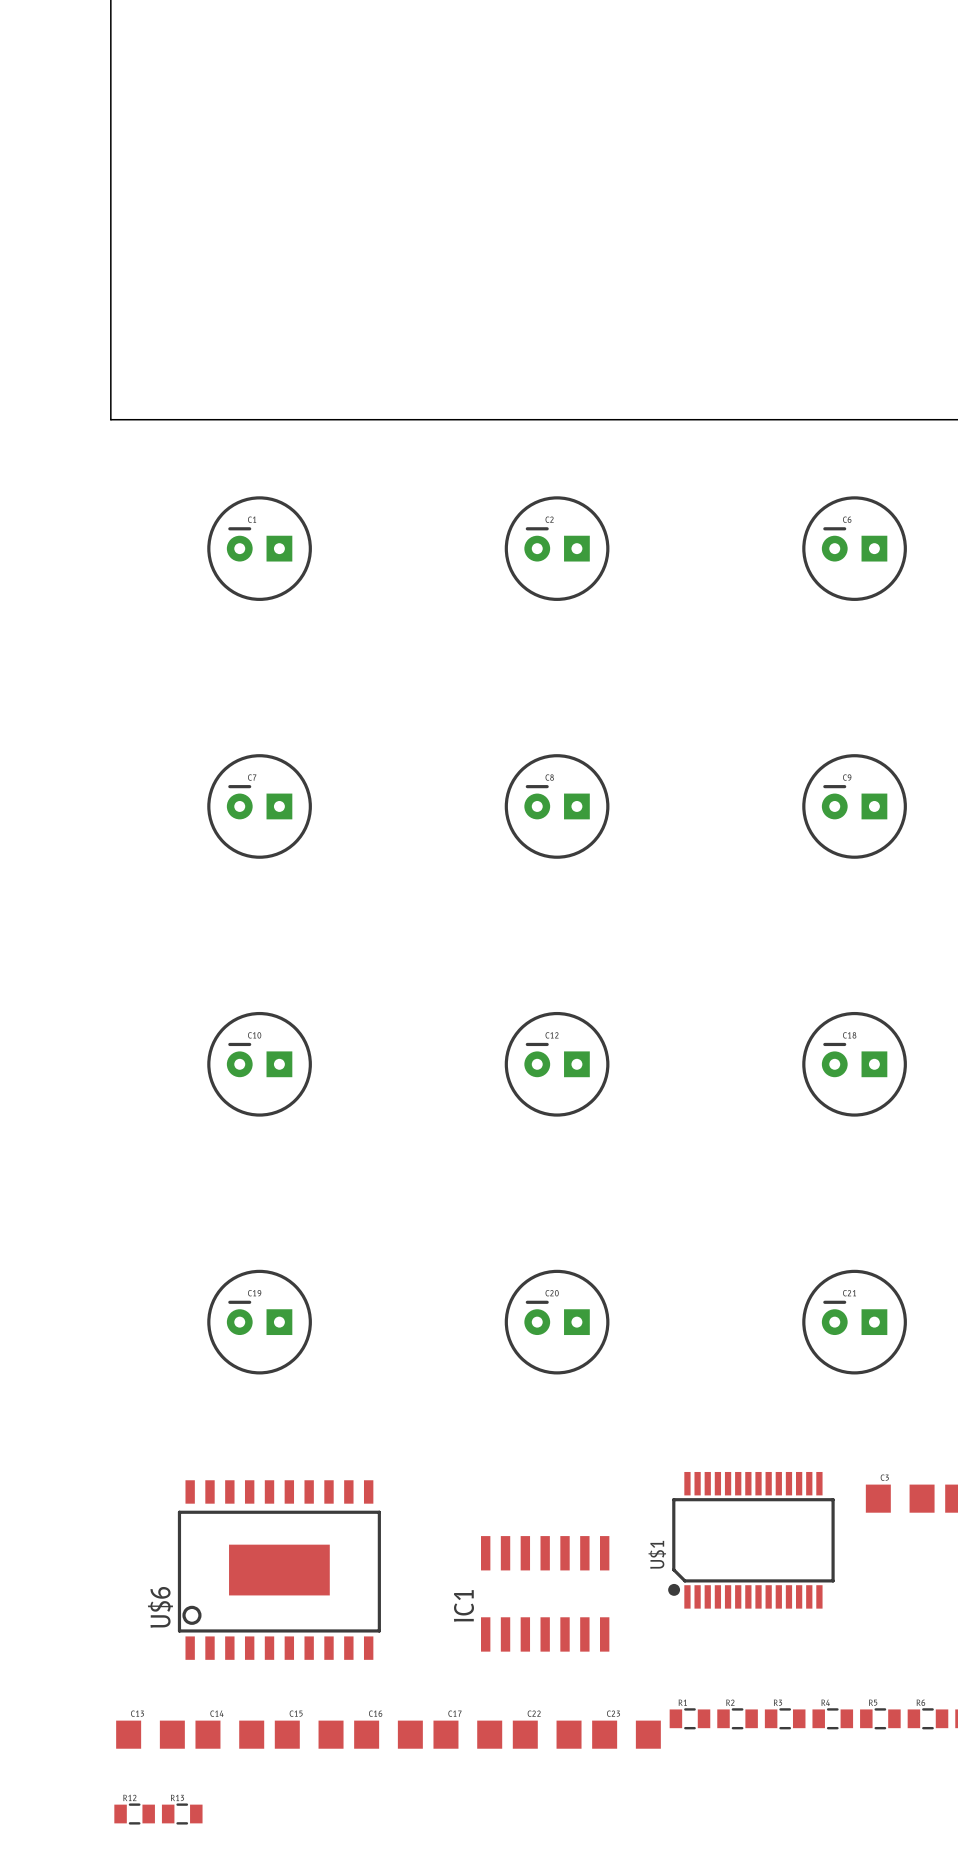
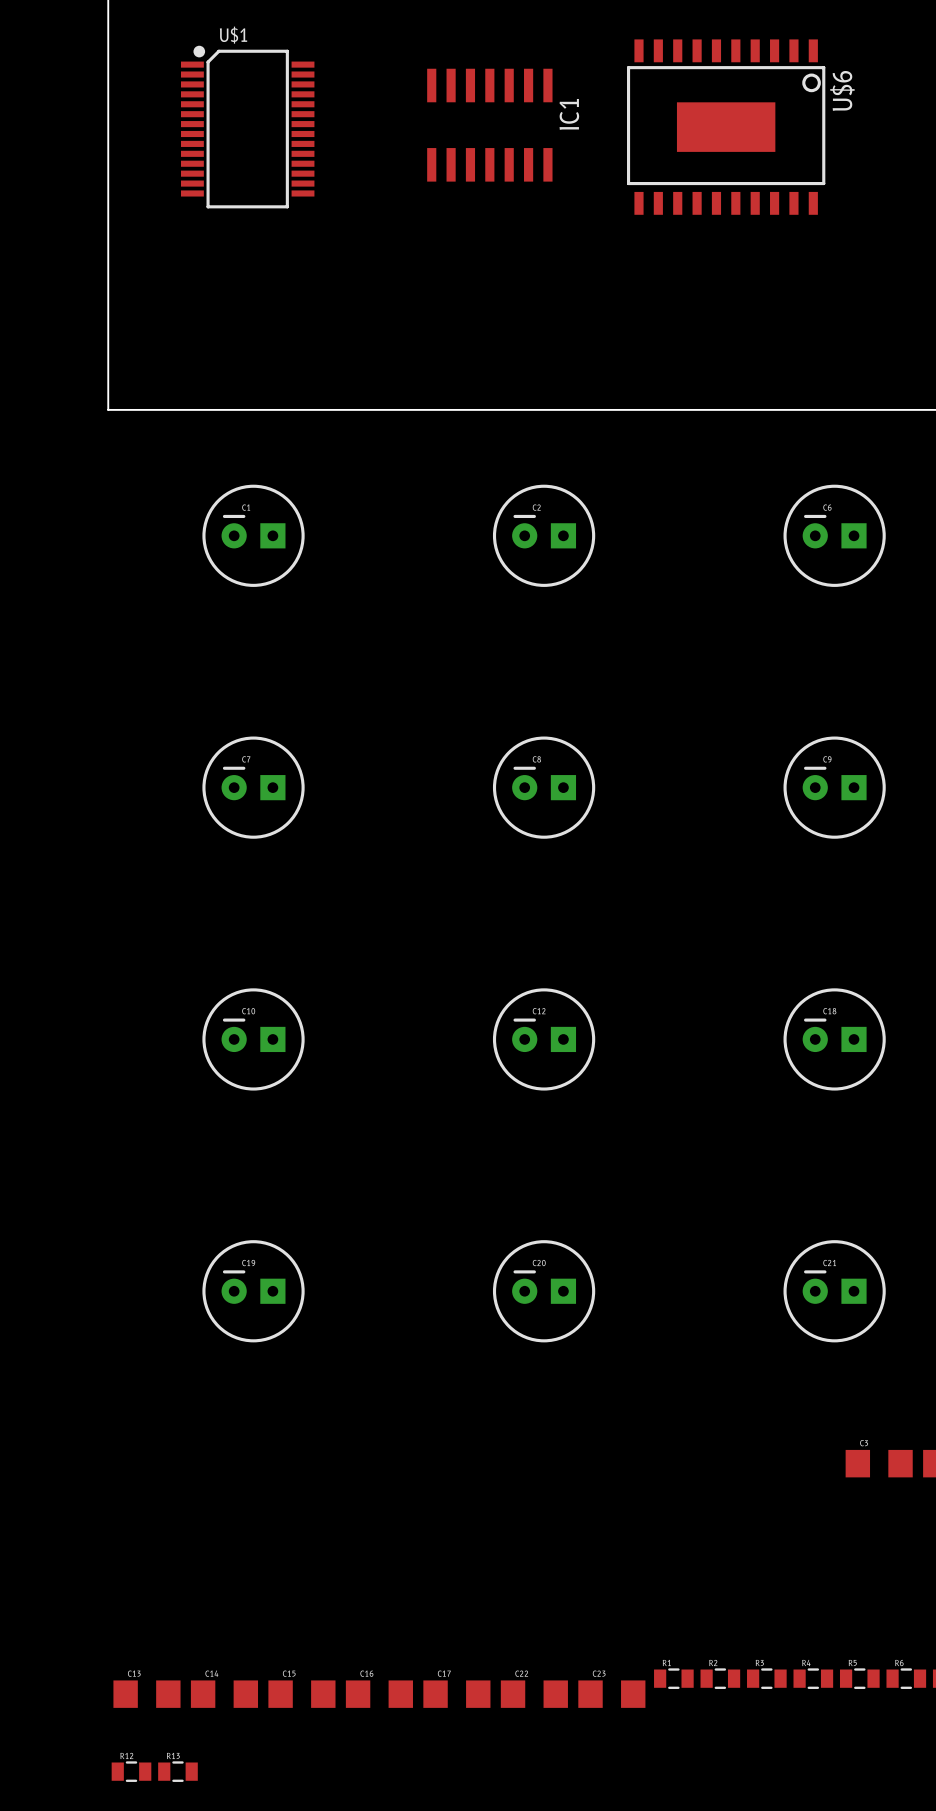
U$1 rotation: 0° (751, 1540) -> 90° clockwise (247, 127)
U$1 position: (751, 1540) -> (247, 127)
U$6 rotation: 0° (279, 1570) -> 180° (726, 127)
U$6 position: (279, 1570) -> (726, 127)
IC1 position: (545, 1593) -> (489, 125)
IC1 name position: IC1 (463, 1605) -> IC1 (569, 114)

